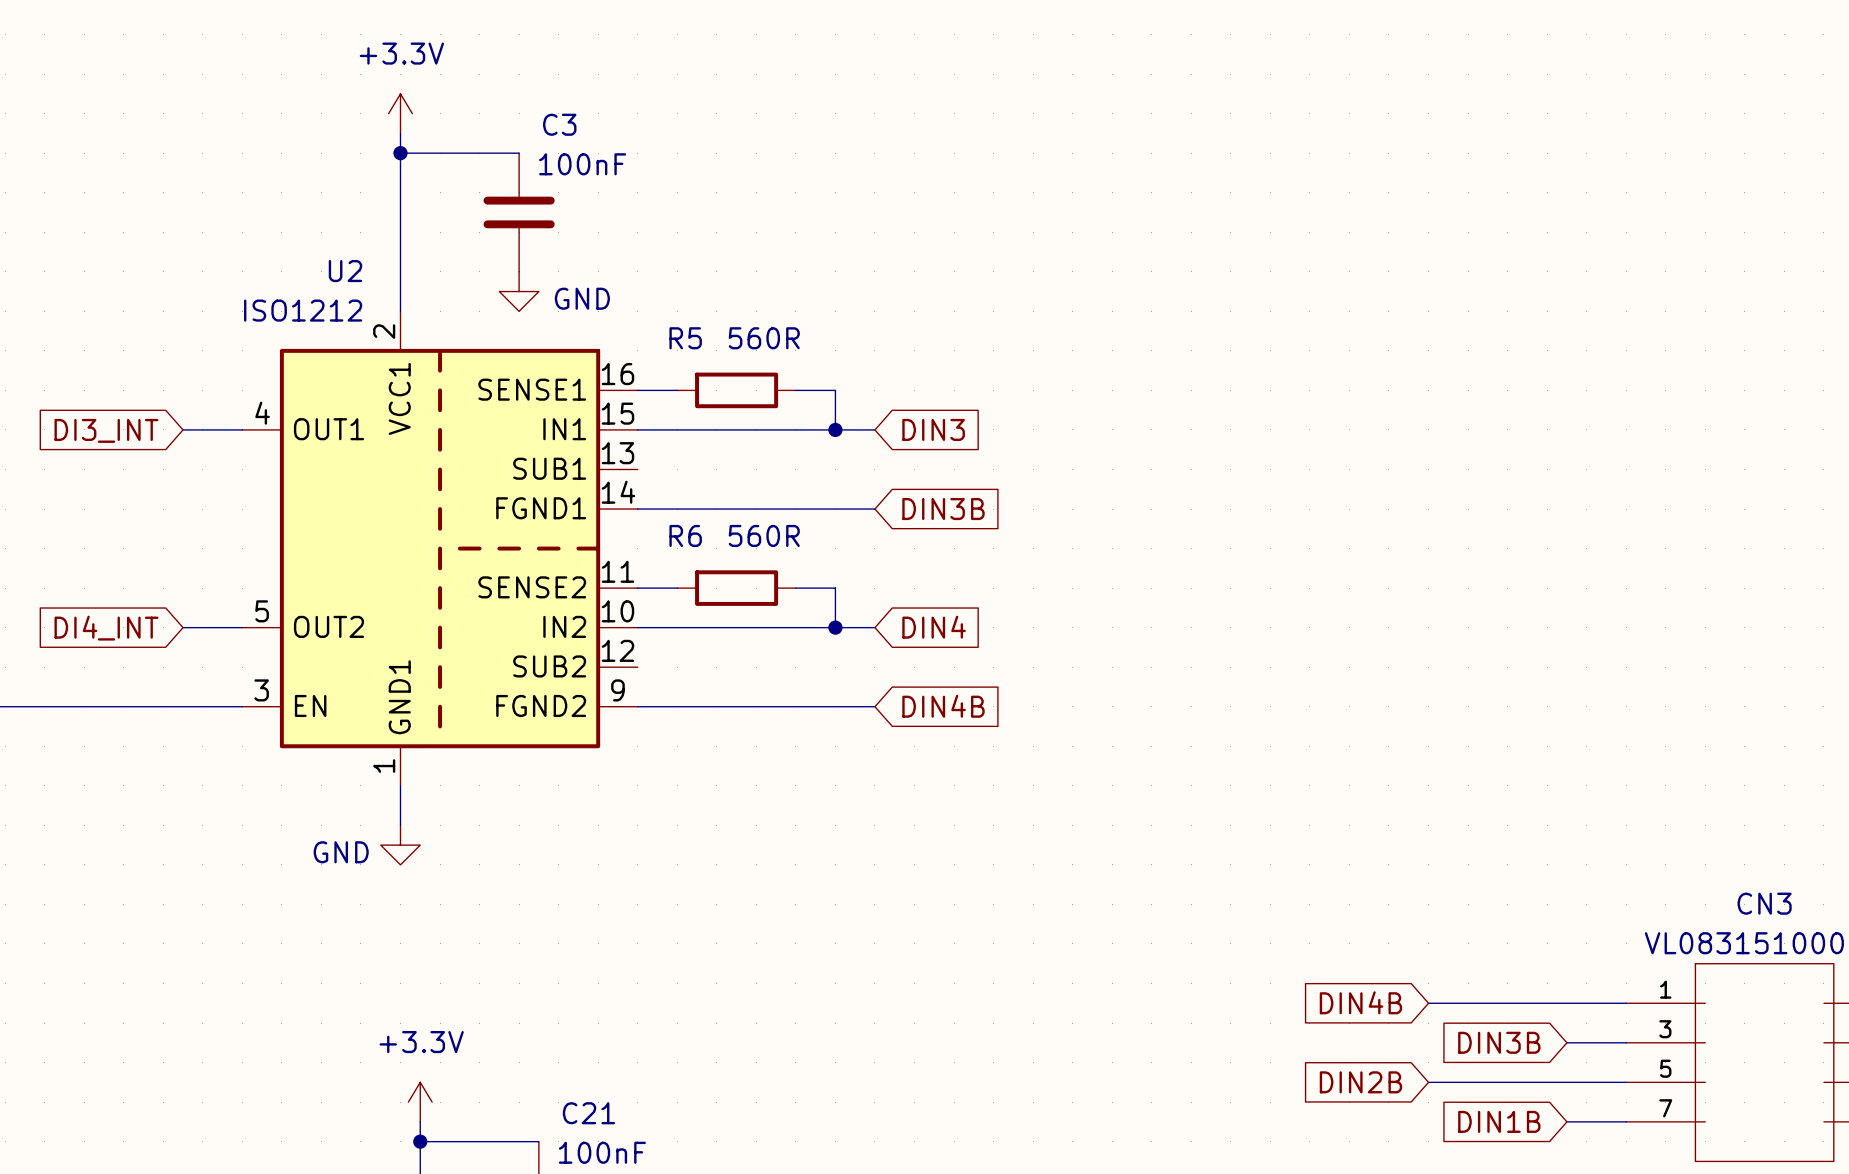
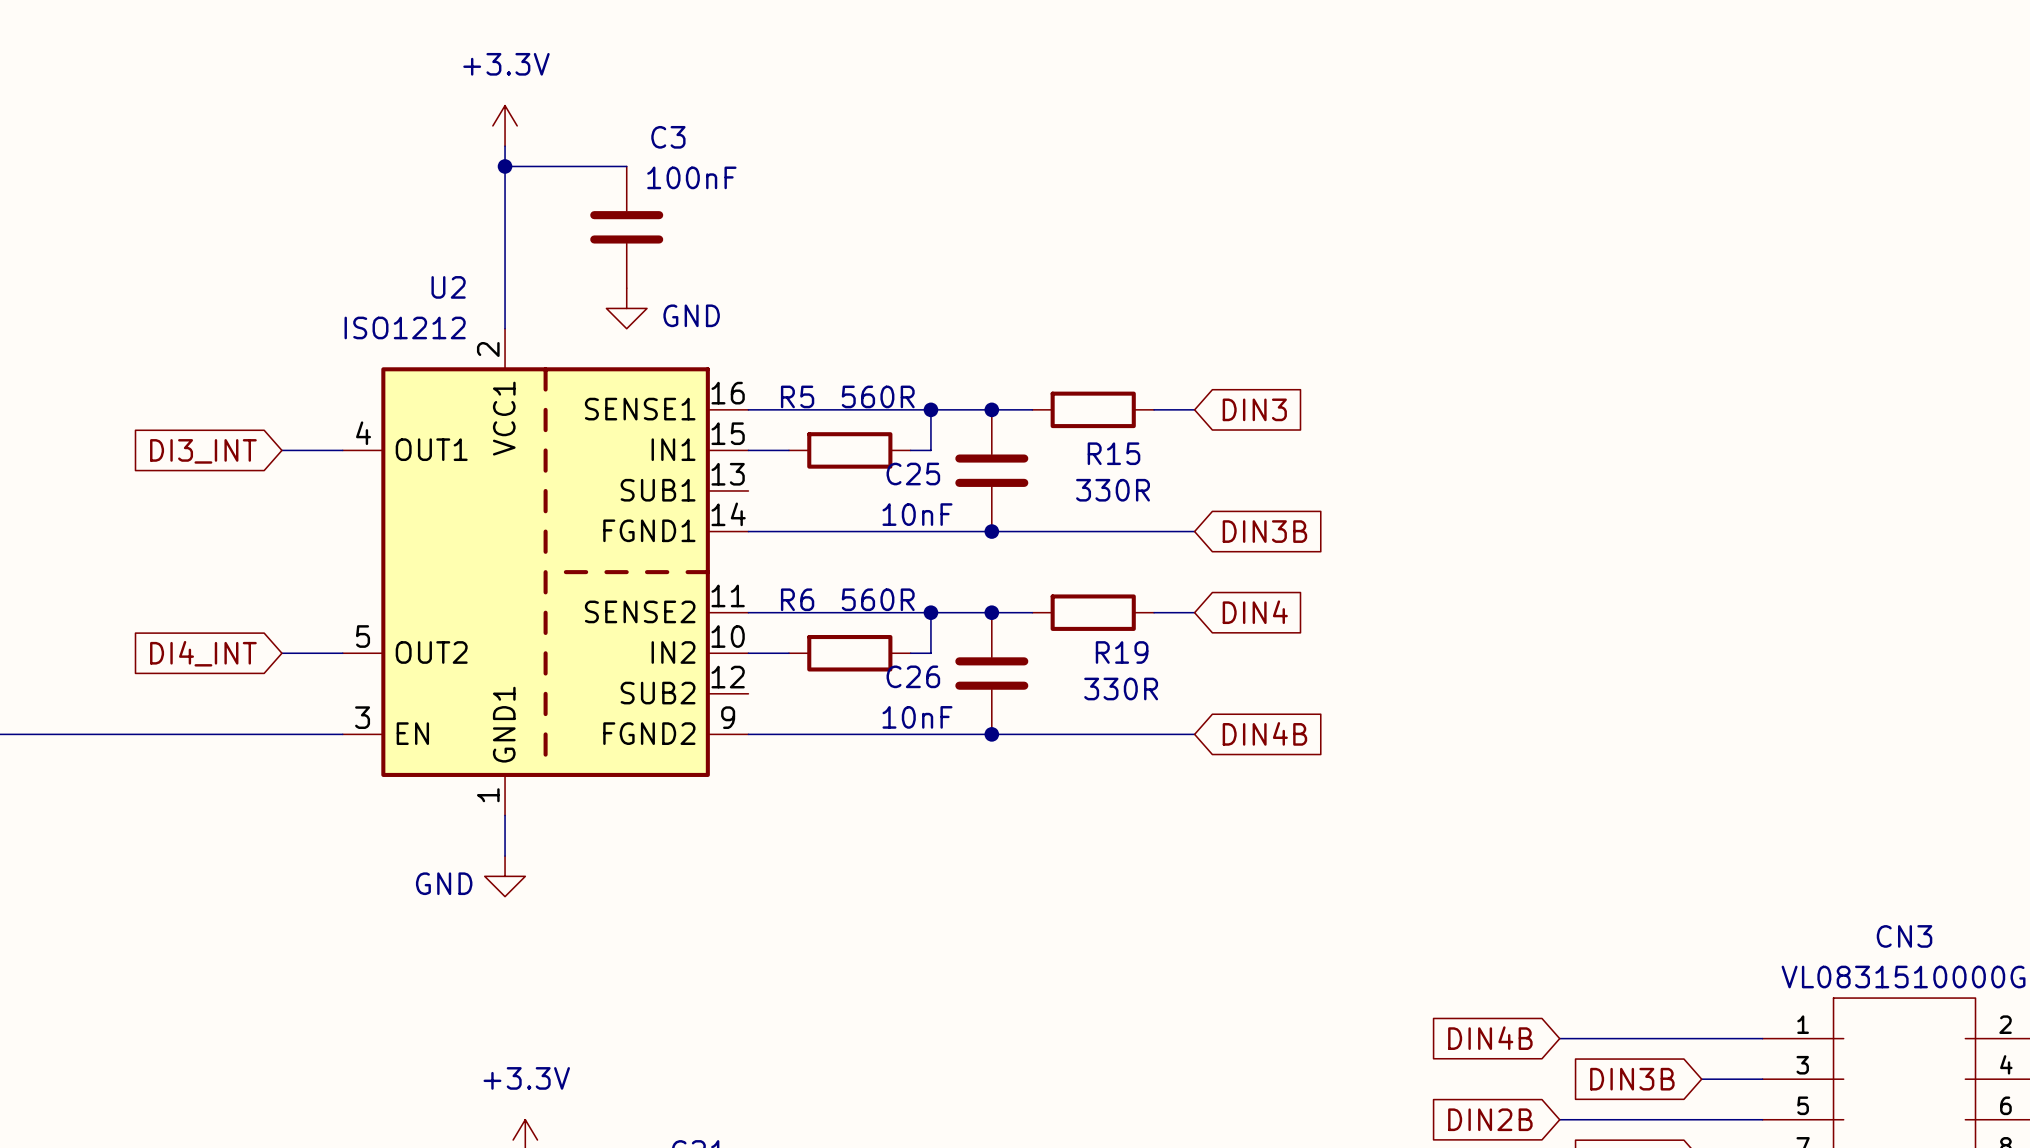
R5 position: (736, 390) -> (849, 450)
junction: none -> (930, 409)
wire: (835, 390) (835, 429) -> (951, 409) (1032, 409)
junction: none -> (991, 409)
R15: none -> 330R (1093, 409)
wire: none -> (1154, 409) (1194, 409)
wire: (677, 429) (795, 429) -> (788, 409) (910, 409)
wire: (815, 429) (874, 429) -> (930, 450) (930, 409)
junction: (835, 429) -> none
global label position: DIN3 (933, 429) -> DIN3 (1254, 409)
C25: none -> 10nF (991, 470)
wire: none -> (991, 531) (1194, 531)
junction: none -> (991, 531)
global label position: DIN3B (943, 509) -> DIN3B (1264, 531)
R6 position: (736, 588) -> (849, 653)
junction: none -> (930, 612)
wire: (835, 588) (835, 627) -> (951, 612) (1032, 612)
junction: none -> (991, 612)
R19: none -> 330R (1093, 612)
wire: none -> (1154, 612) (1194, 612)
wire: (677, 627) (795, 627) -> (788, 612) (910, 612)
wire: (815, 627) (874, 627) -> (930, 653) (930, 612)
junction: (835, 627) -> none
global label position: DIN4 (934, 627) -> DIN4 (1255, 612)
C26: none -> 10nF (991, 673)
wire: none -> (991, 734) (1194, 734)
junction: none -> (991, 734)
global label position: DIN4B (943, 706) -> DIN4B (1264, 733)

